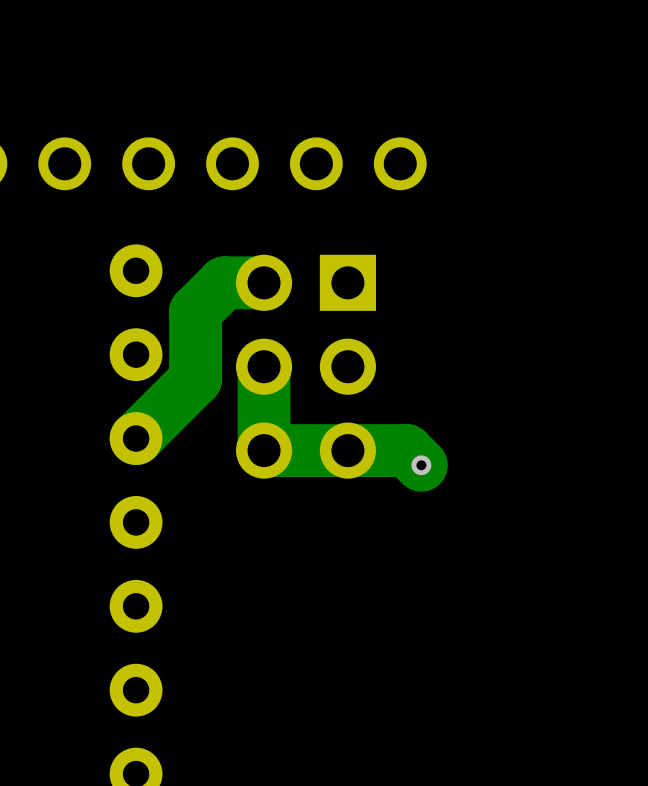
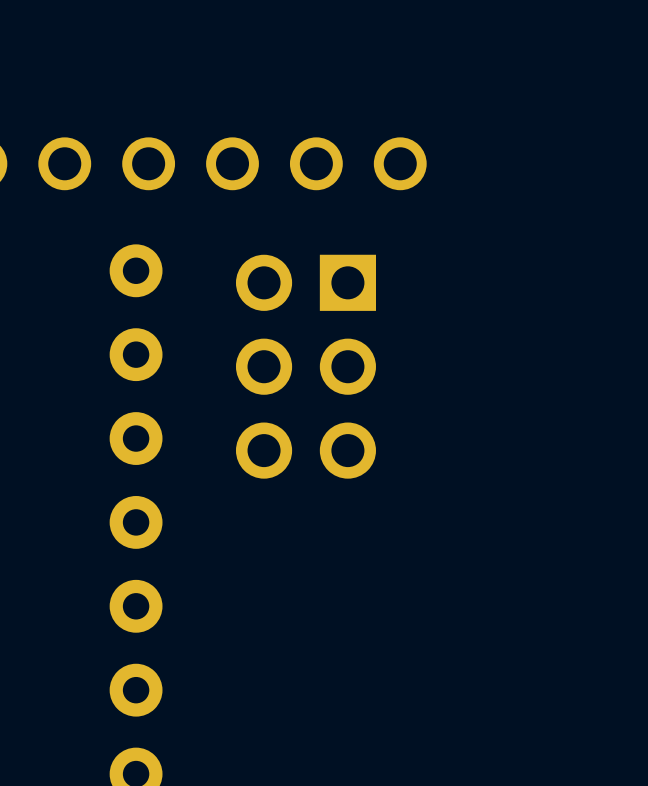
track: (264, 282) (224, 282) (195, 311) (195, 379) (136, 438) -> none
track: (264, 366) (264, 450) (406, 450) (421, 465) -> none
via: (421, 465) -> none

